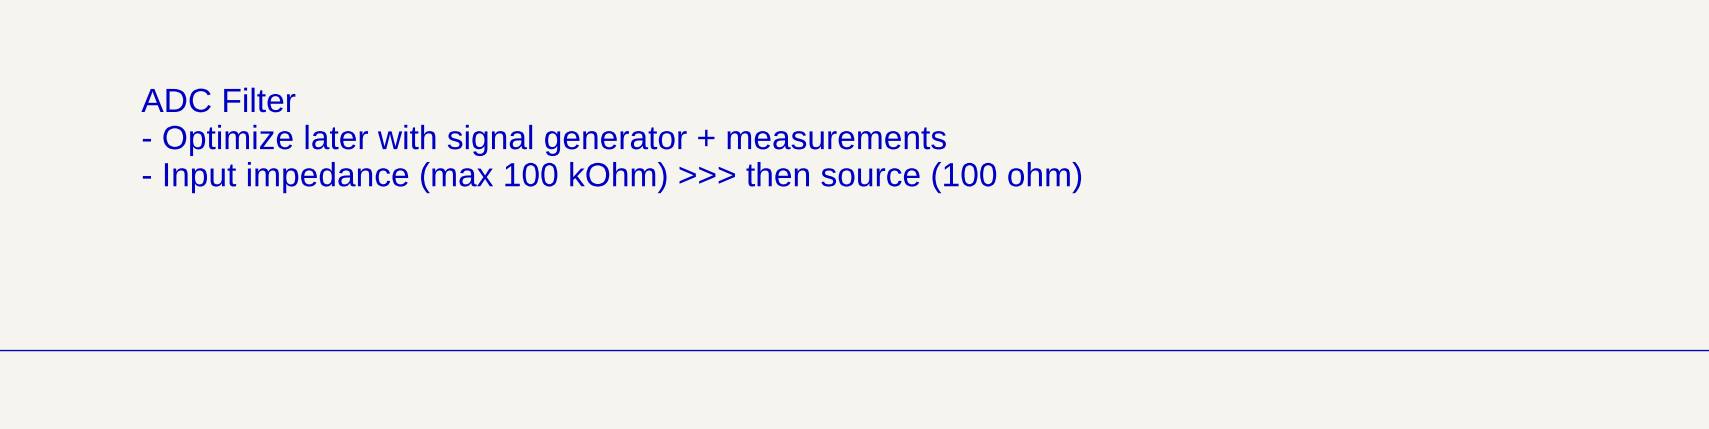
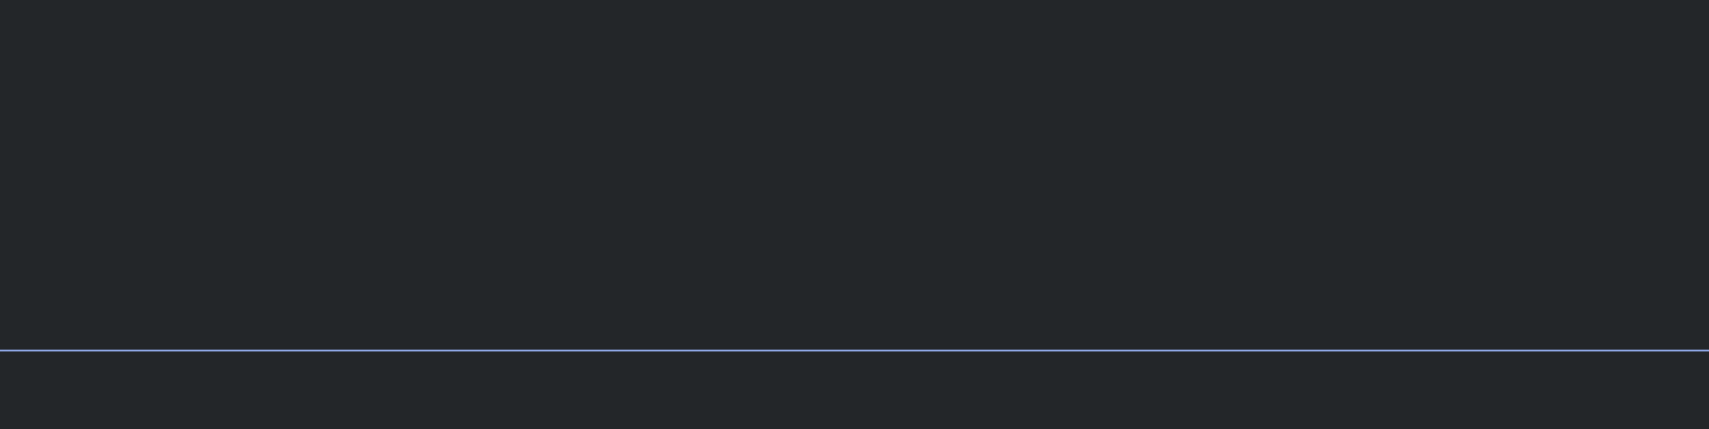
text: ADC Filter (218, 100) -> none
text: - Optimize later with signal generator + measurements (544, 140) -> none
text: - Input impedance (max 100 kOhm) >>> then source (100 ohm) (611, 177) -> none

